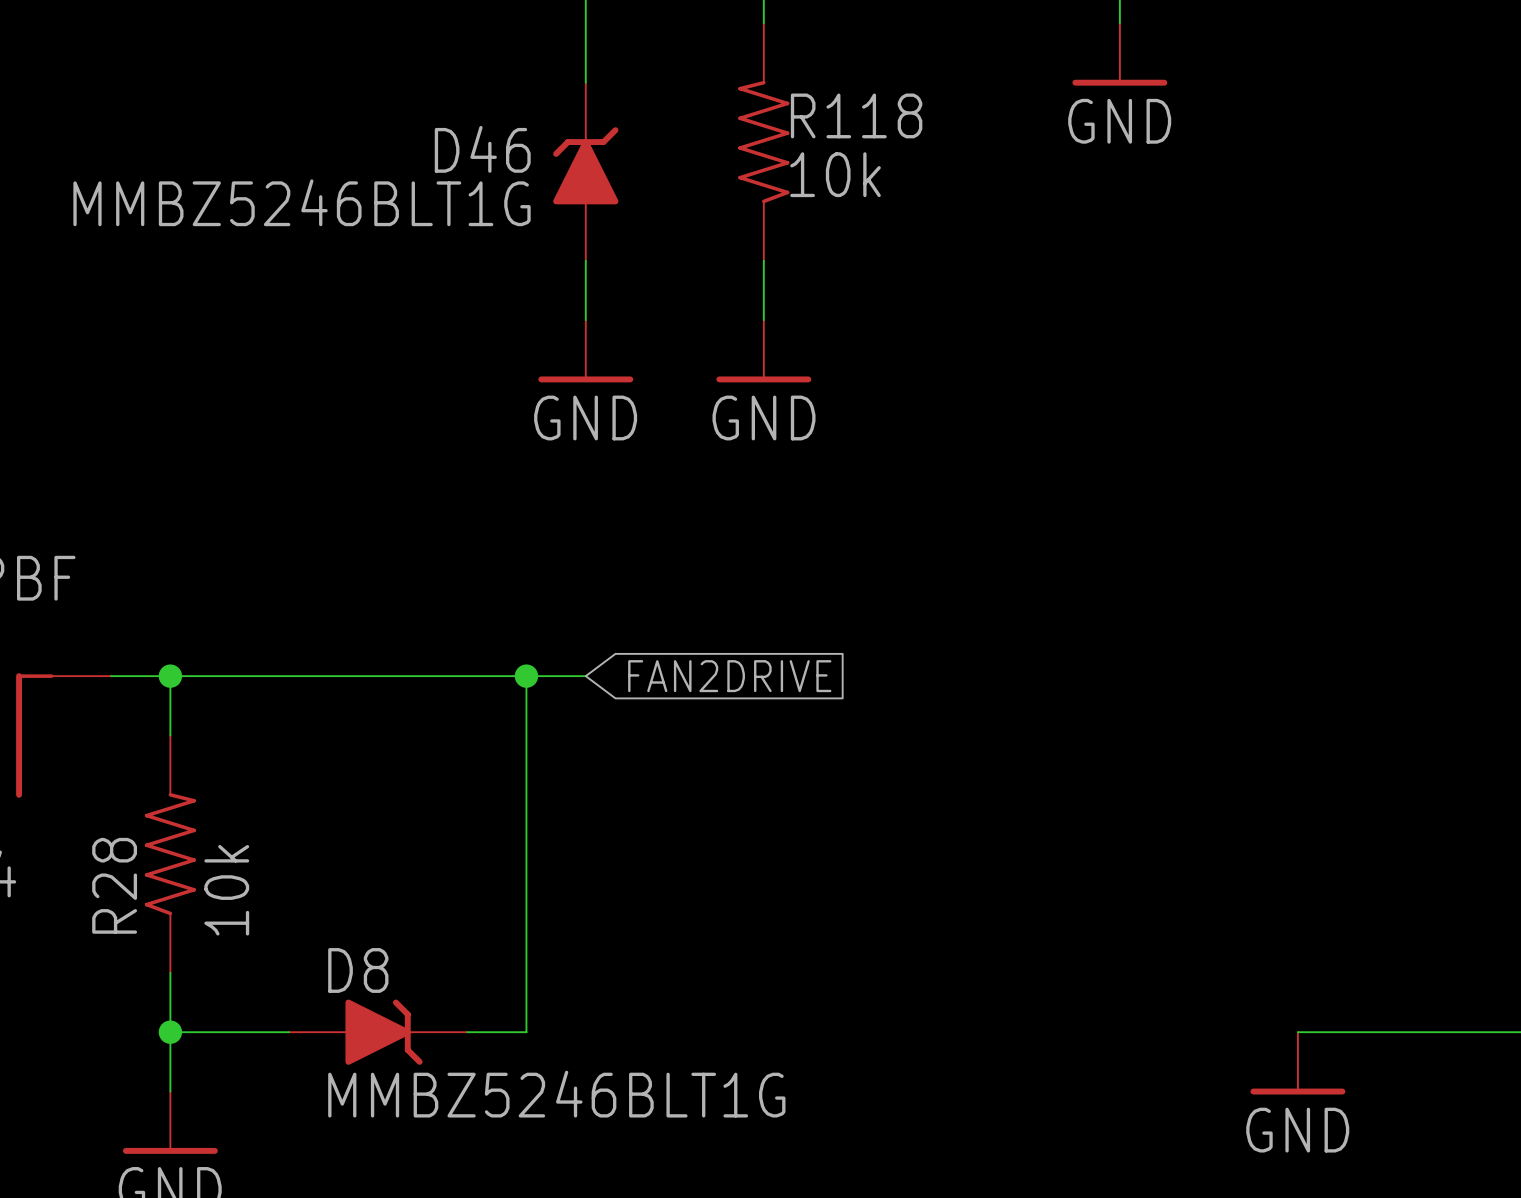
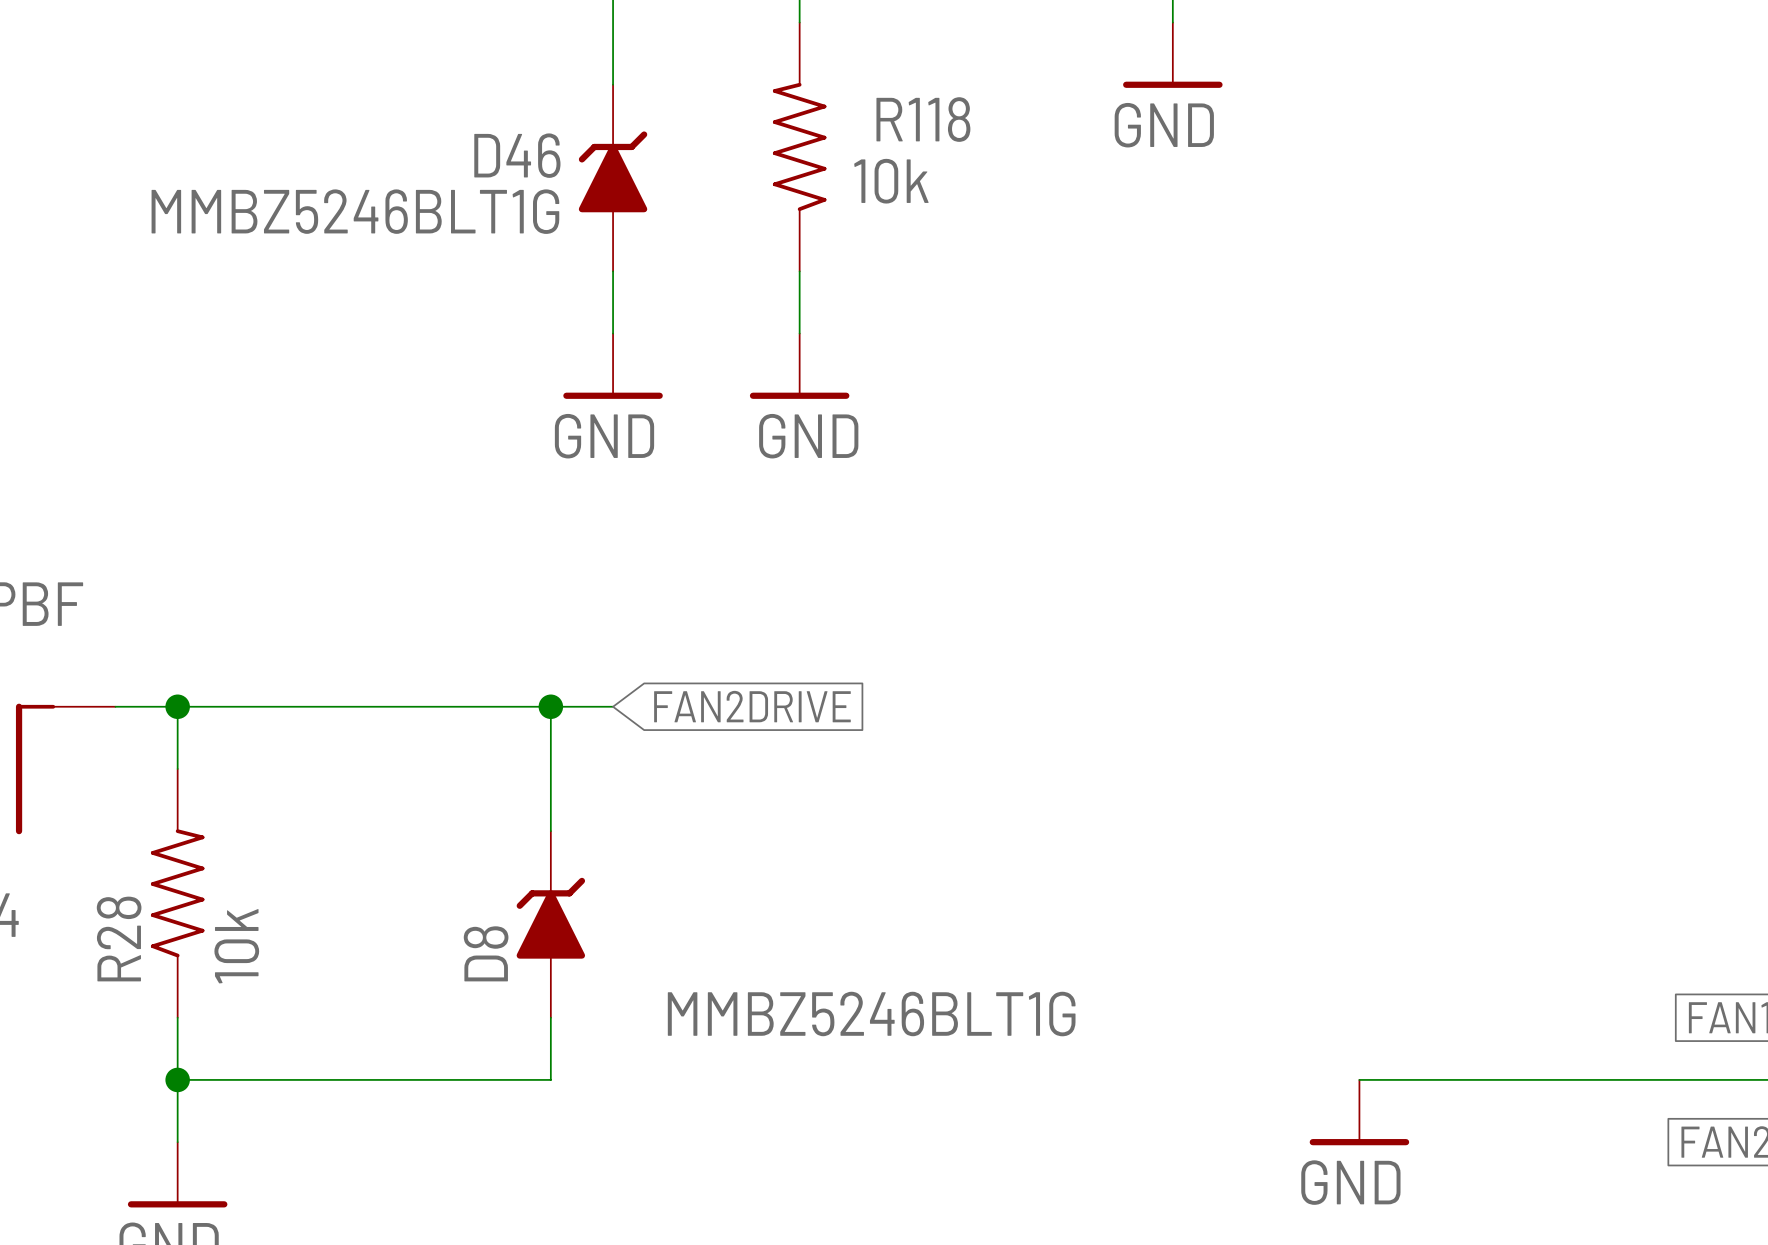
D8 position: (378, 1032) -> (550, 924)
D8 rotation: 0° (384, 1032) -> 90° counterclockwise (550, 918)

